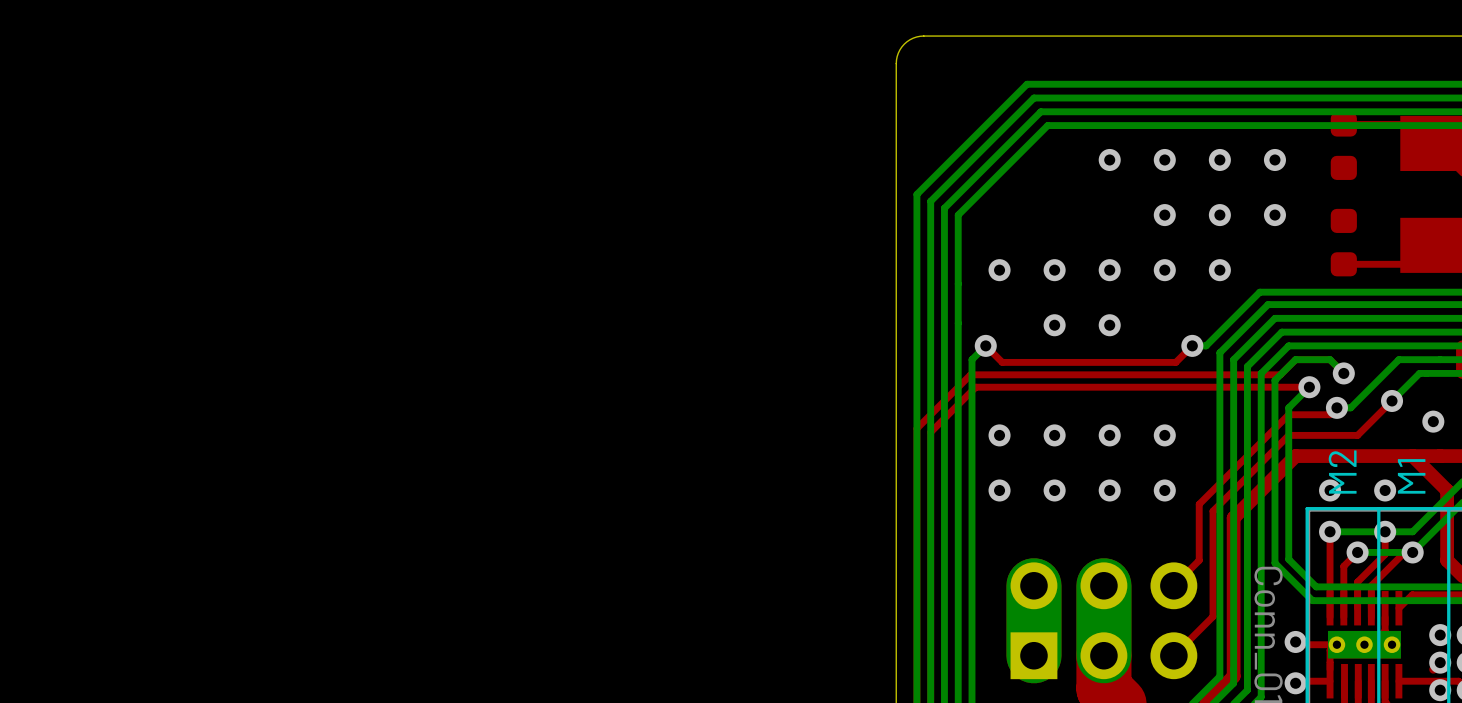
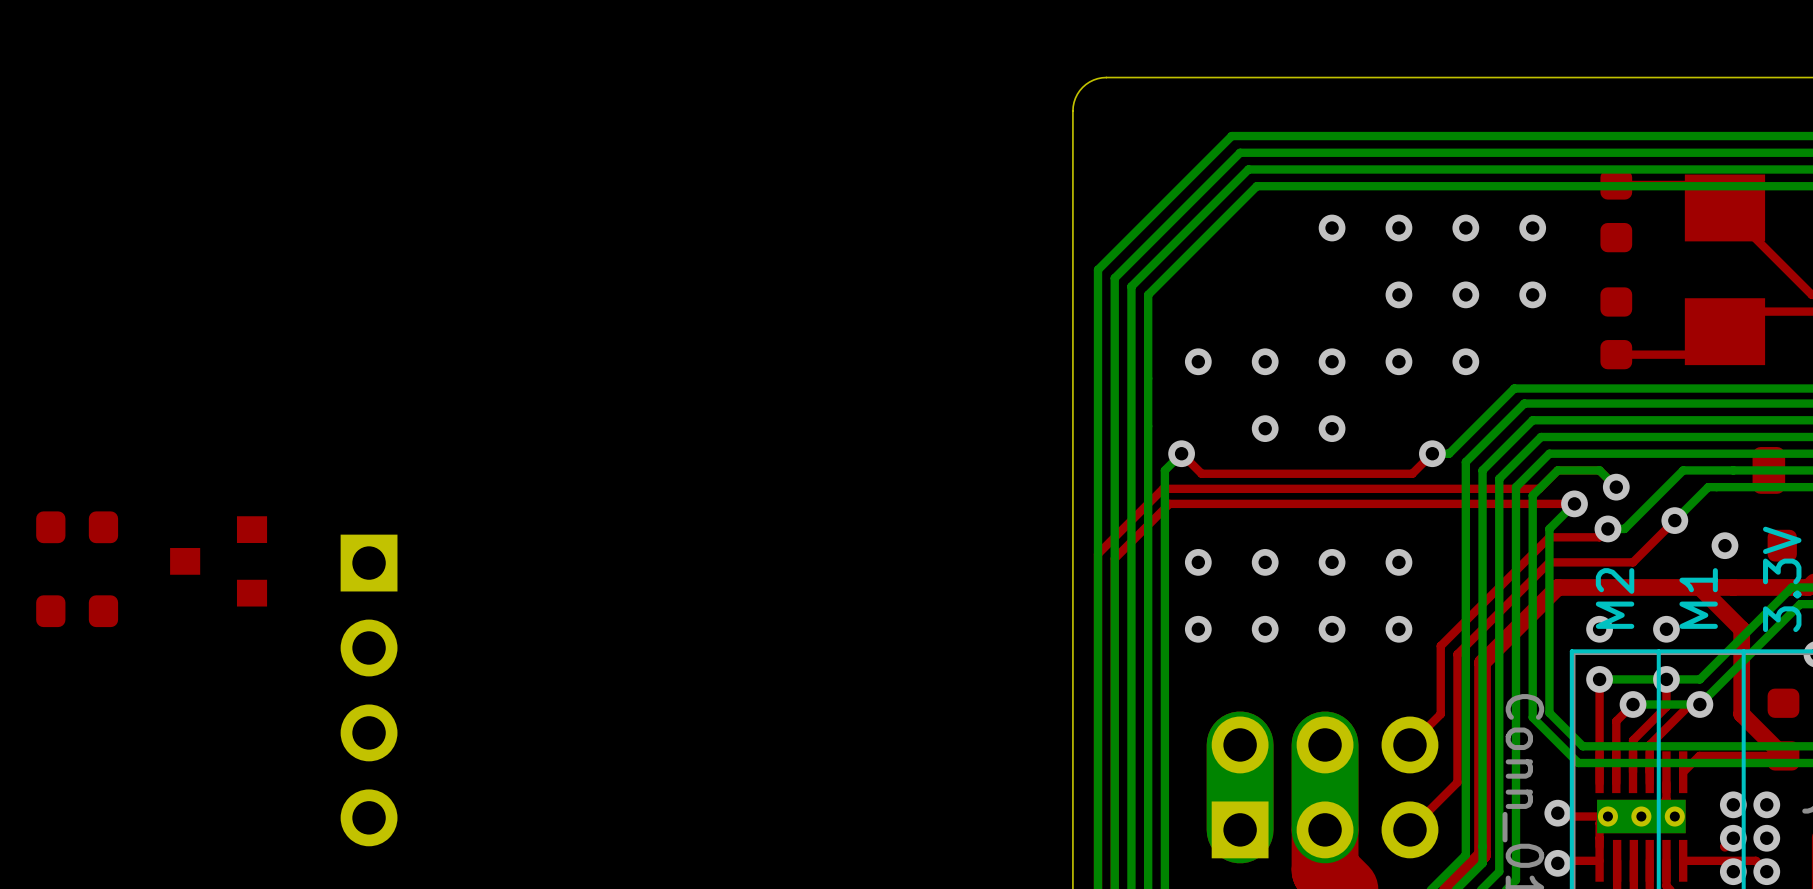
part: none -> (77, 527)
part: none -> (218, 561)
part: none -> (77, 611)
part: none -> (369, 690)

